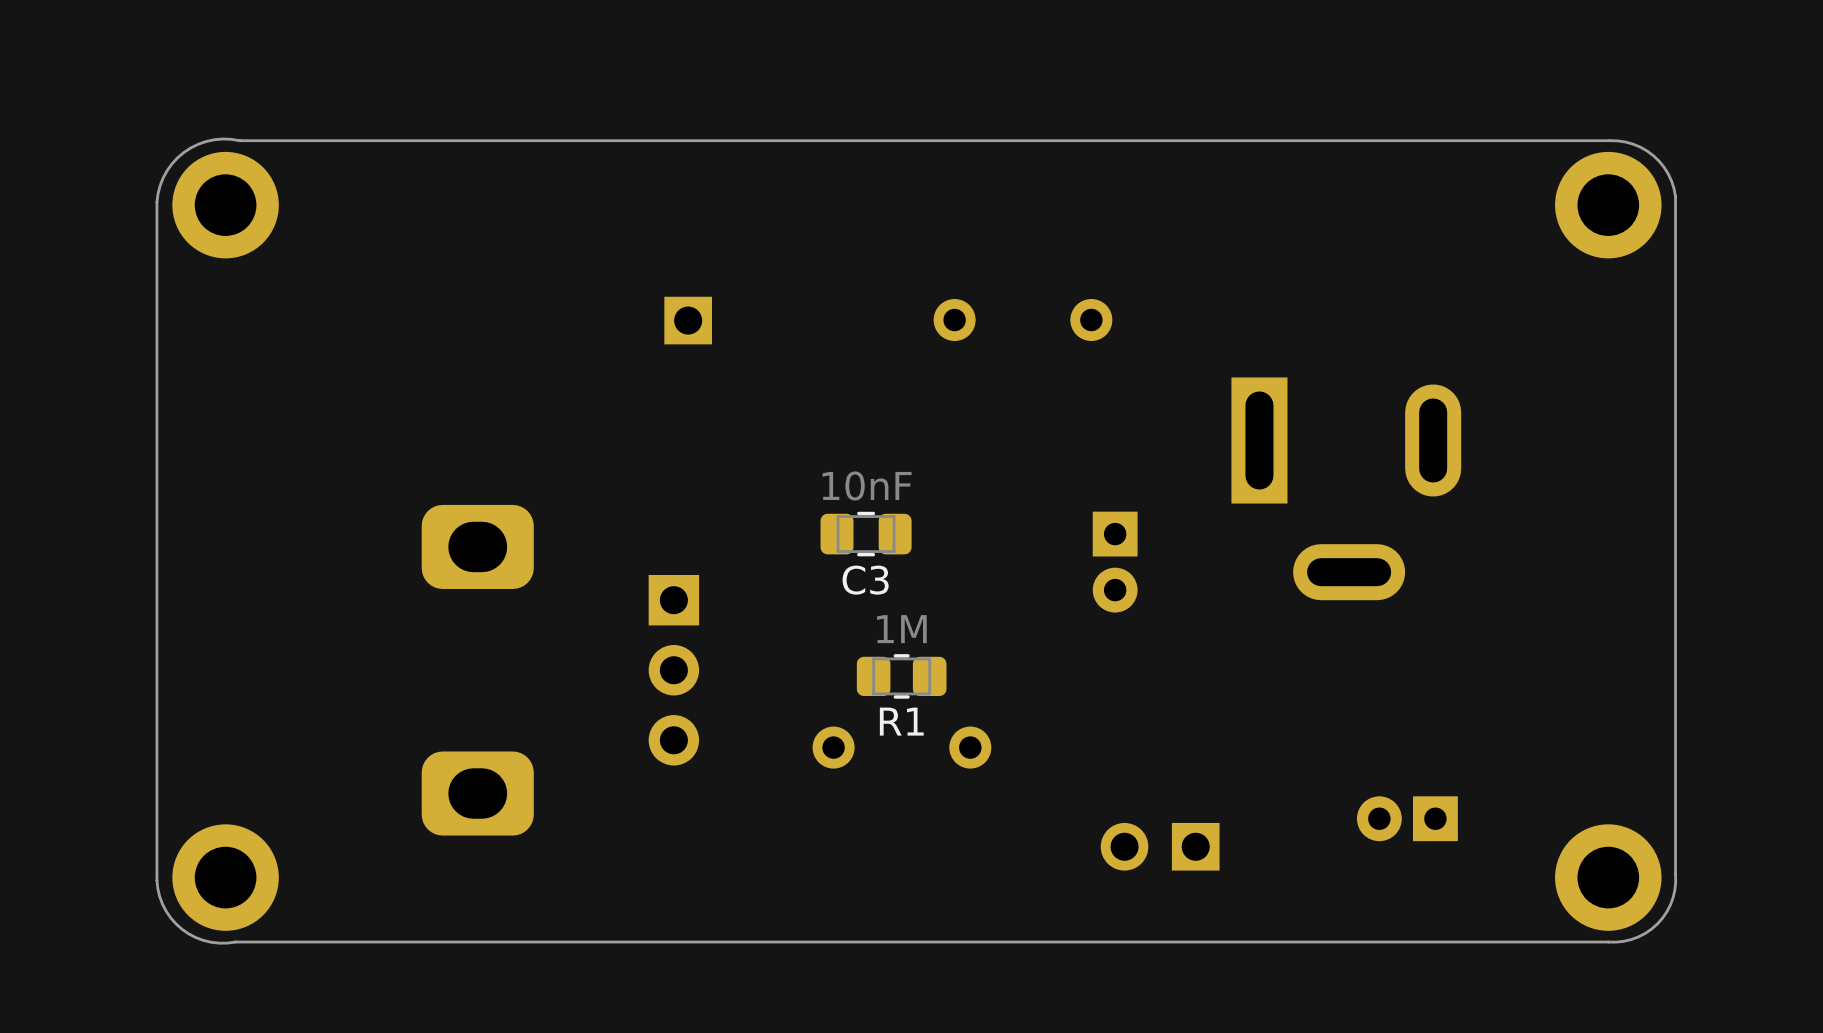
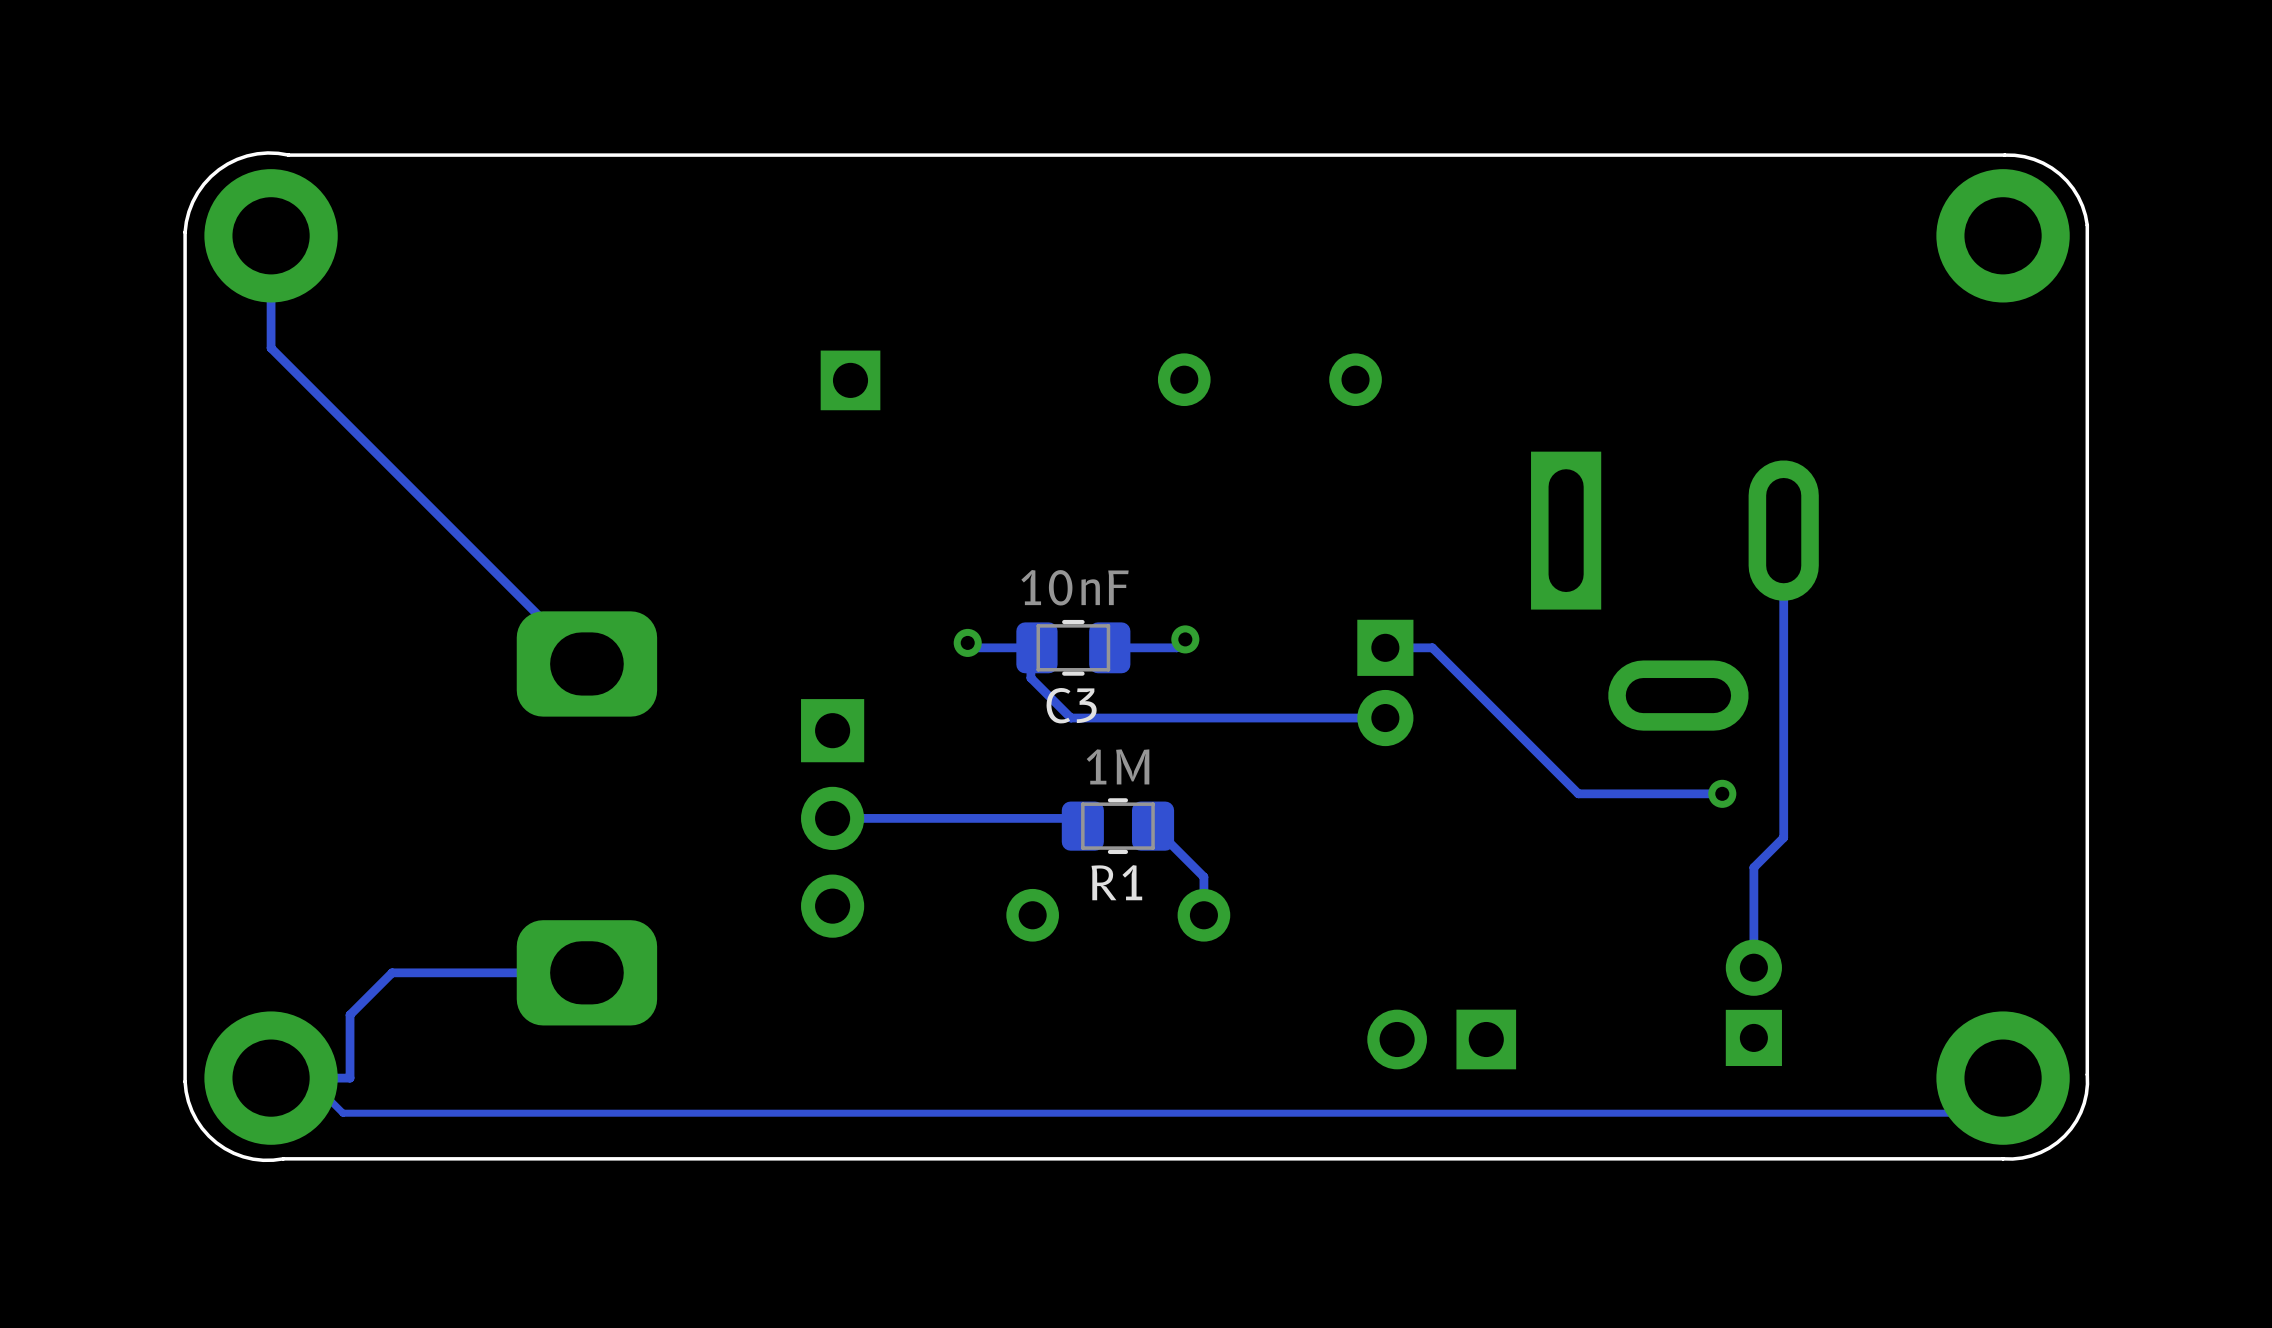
track: none -> (271, 235) (271, 348) (586, 663)
track: none -> (1783, 530) (1783, 837) (1753, 867) (1753, 967)
track: none -> (1185, 639) (1176, 647) (1109, 647)
via: none -> (1185, 639)
track: none -> (967, 642) (972, 647) (1036, 647) (1030, 653) (1030, 678) (1070, 718) (1385, 718)
via: none -> (967, 642)
track: none -> (1385, 647) (1432, 647) (1578, 793) (1722, 793)
via: none -> (1722, 793)
track: none -> (832, 818) (1075, 818) (1082, 826)
track: none -> (1153, 826) (1203, 877) (1203, 915)
track: none -> (586, 972) (392, 972) (350, 1014) (350, 1078) (271, 1078) (307, 1078) (343, 1113) (1967, 1113) (2003, 1078)
part rotation: 0° (1407, 818) -> 90° clockwise (1753, 1002)

